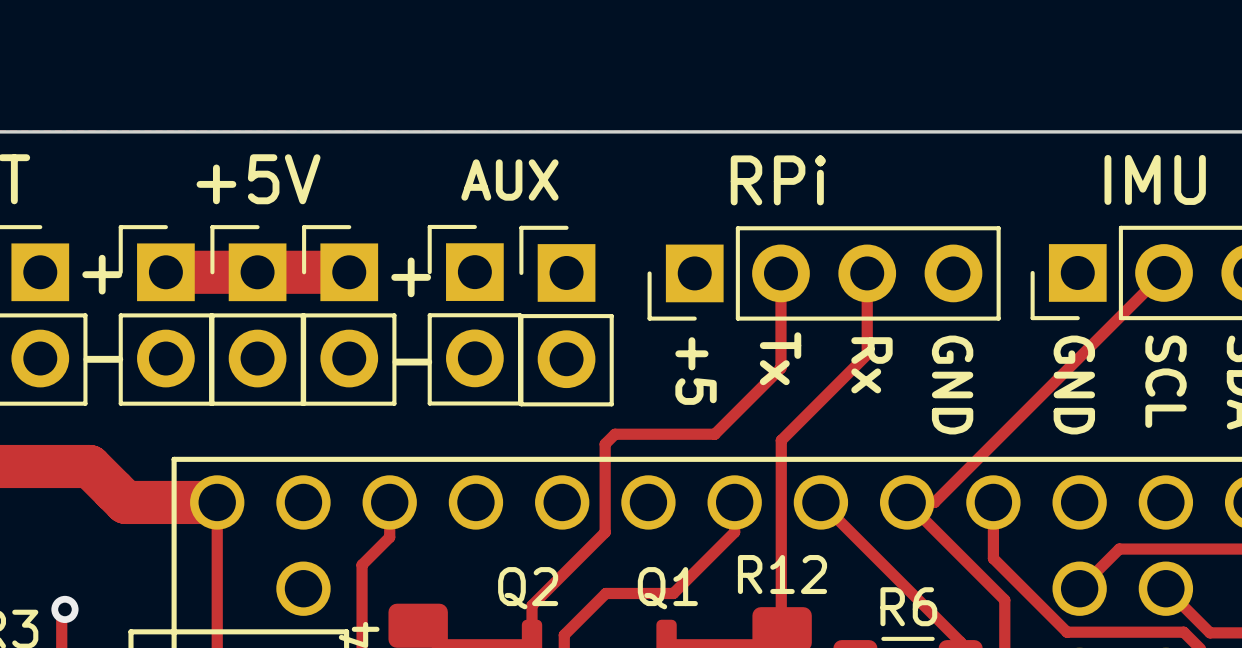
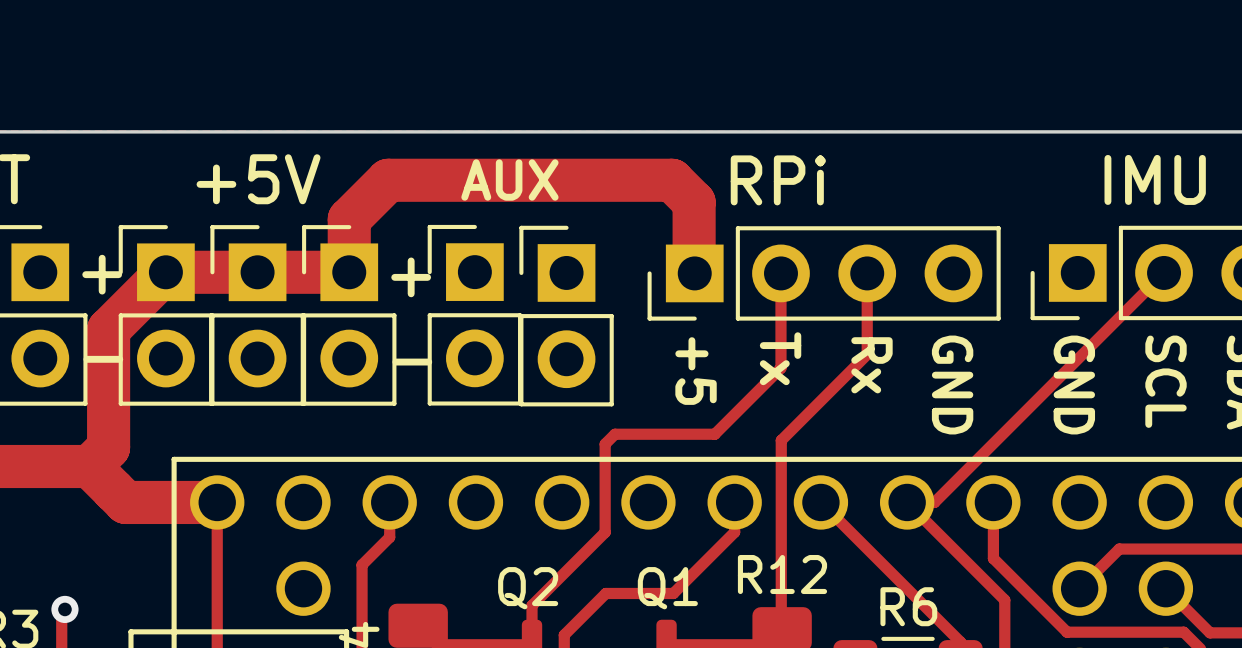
track: none -> (165, 272) (108, 329) (108, 447) (89, 466)
track: none -> (349, 272) (349, 219) (388, 180) (672, 180) (694, 202) (694, 273)

